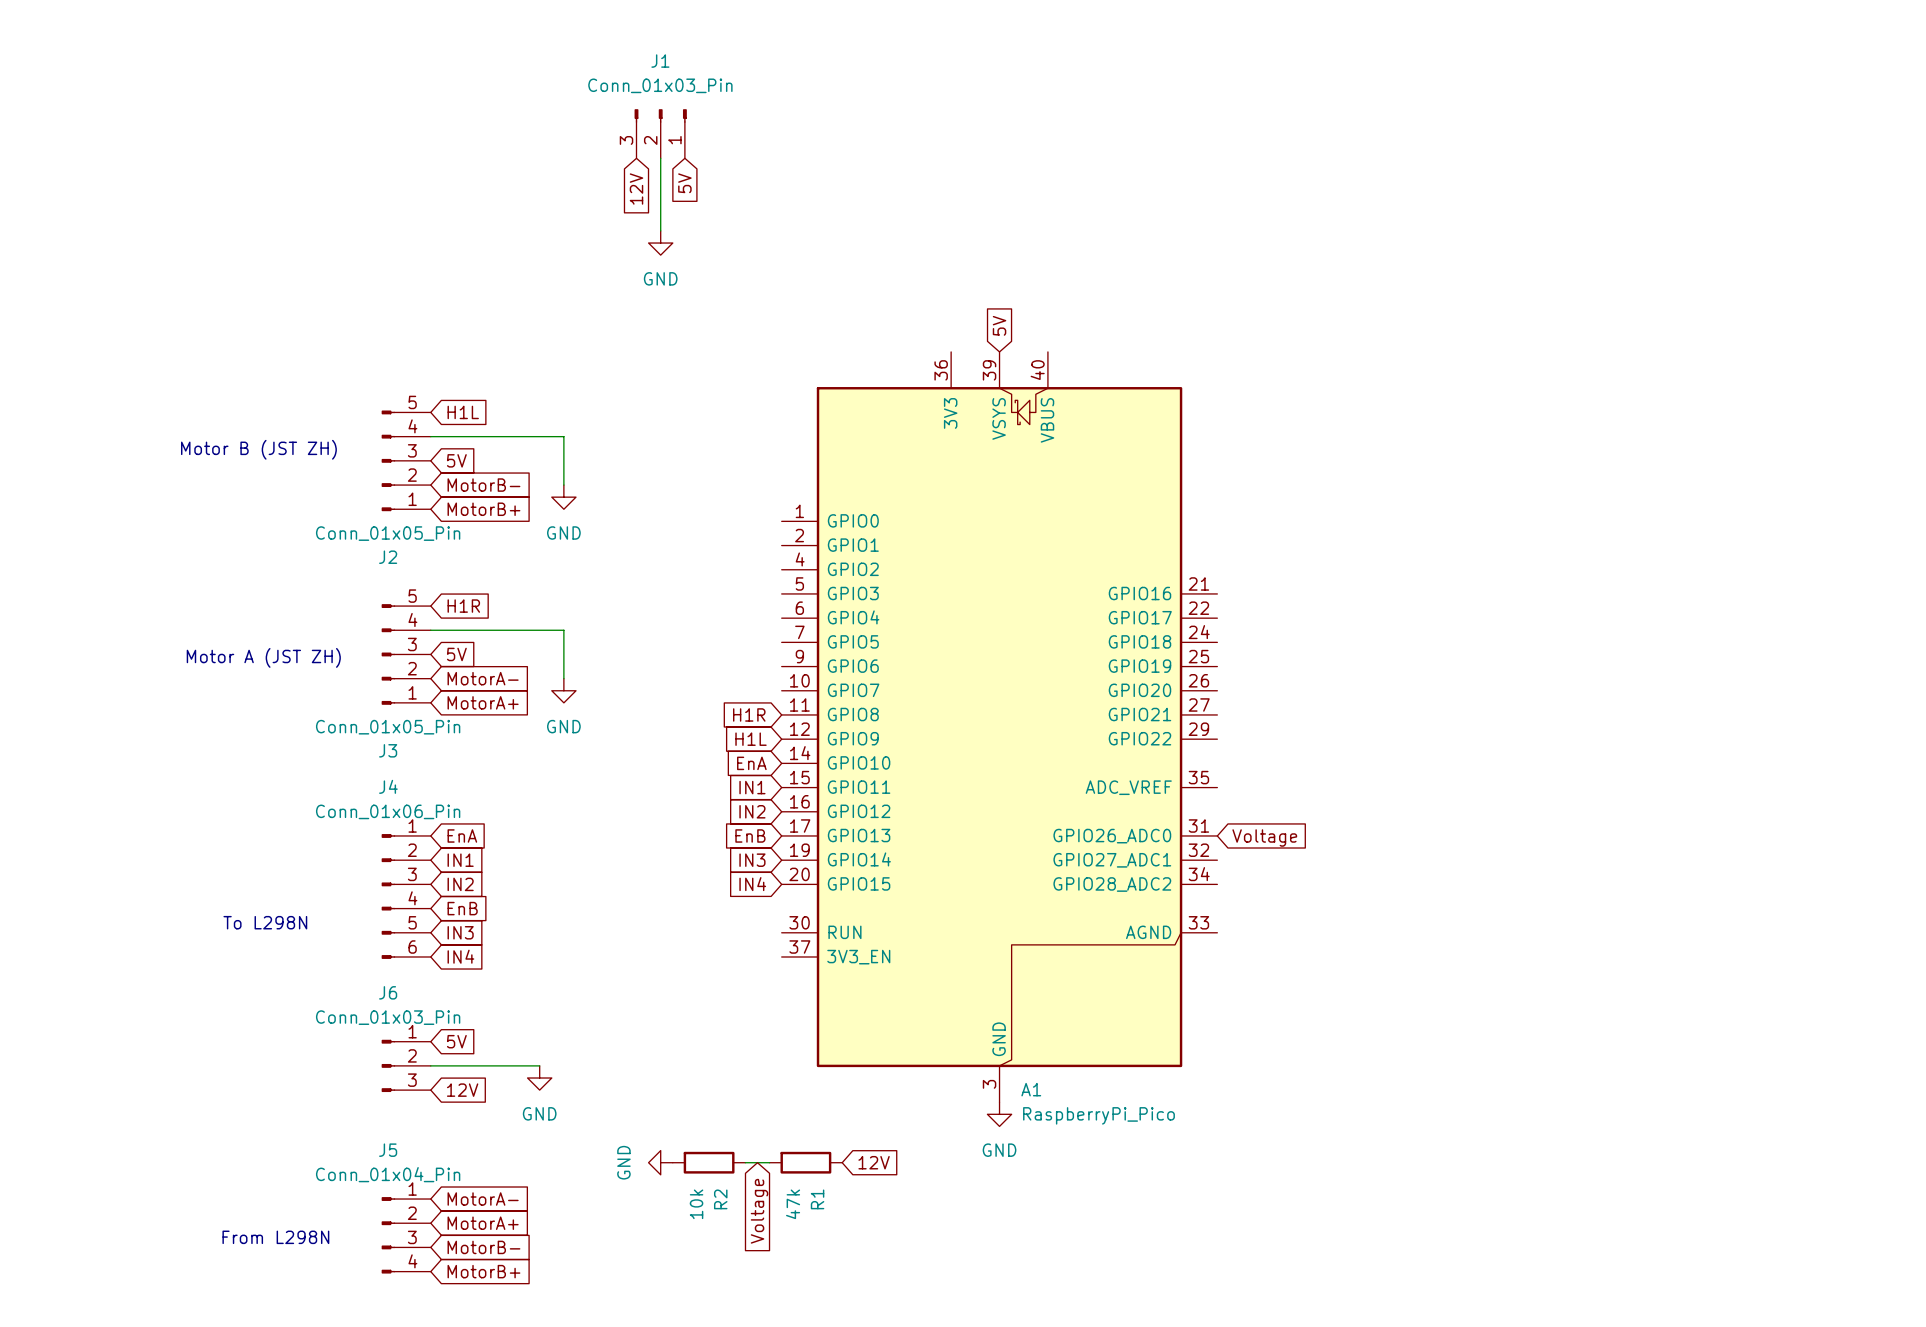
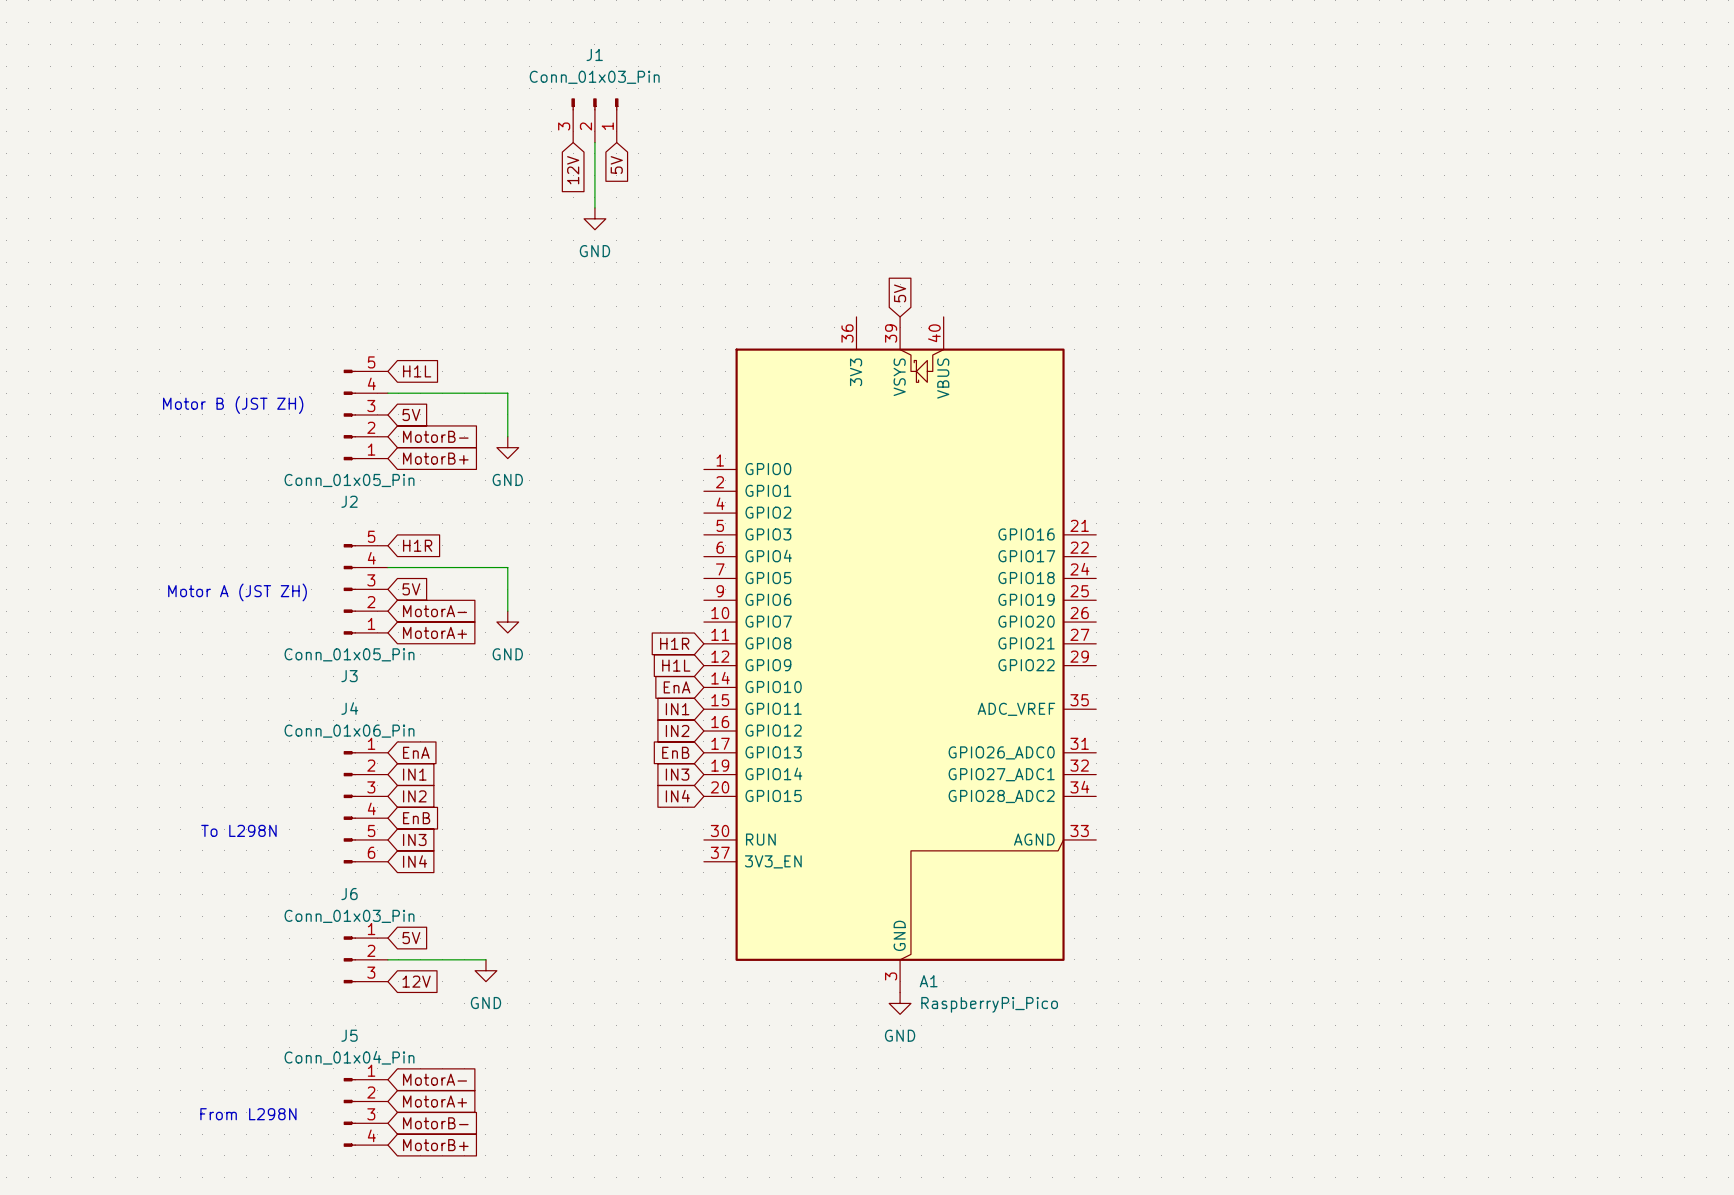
global label: Voltage (1264, 838) -> none
power symbol: GND (660, 1162) -> none
R2: 10k (709, 1162) -> none
wire: (745, 1162) (769, 1162) -> none
R1: 47k (805, 1162) -> none
global label: 12V (874, 1162) -> none
global label: Voltage (759, 1211) -> none

